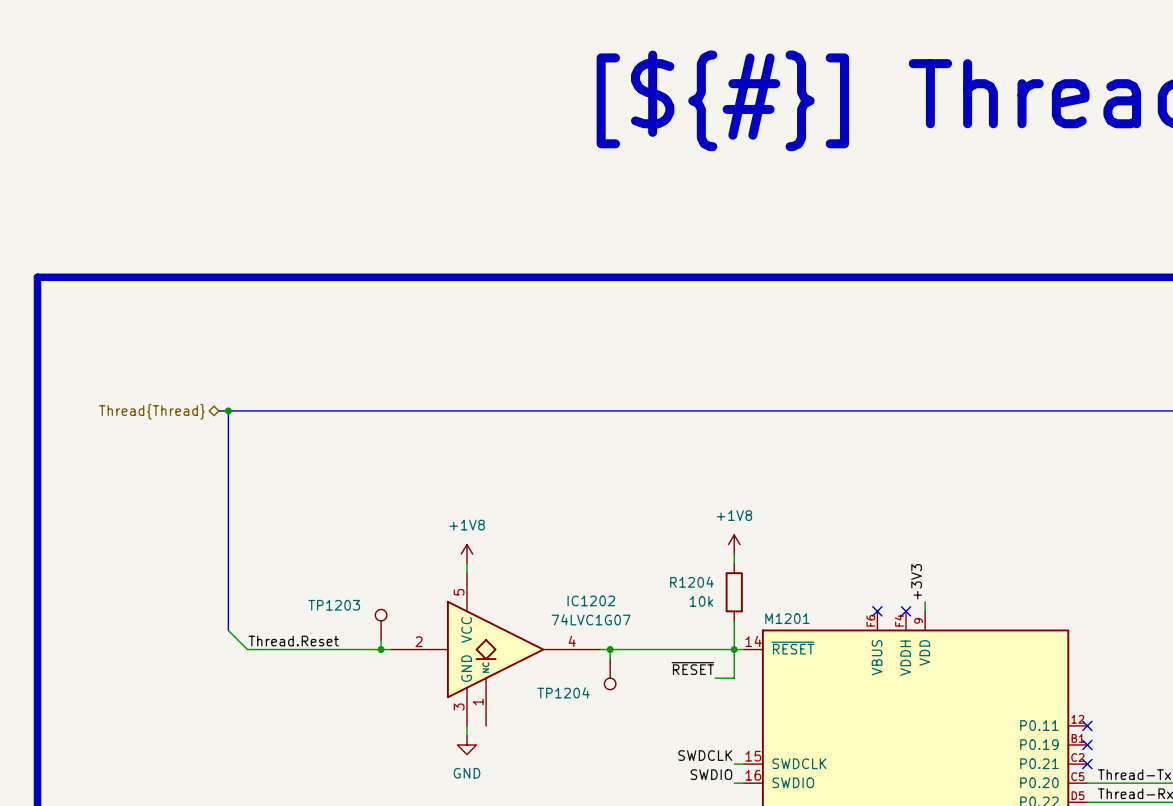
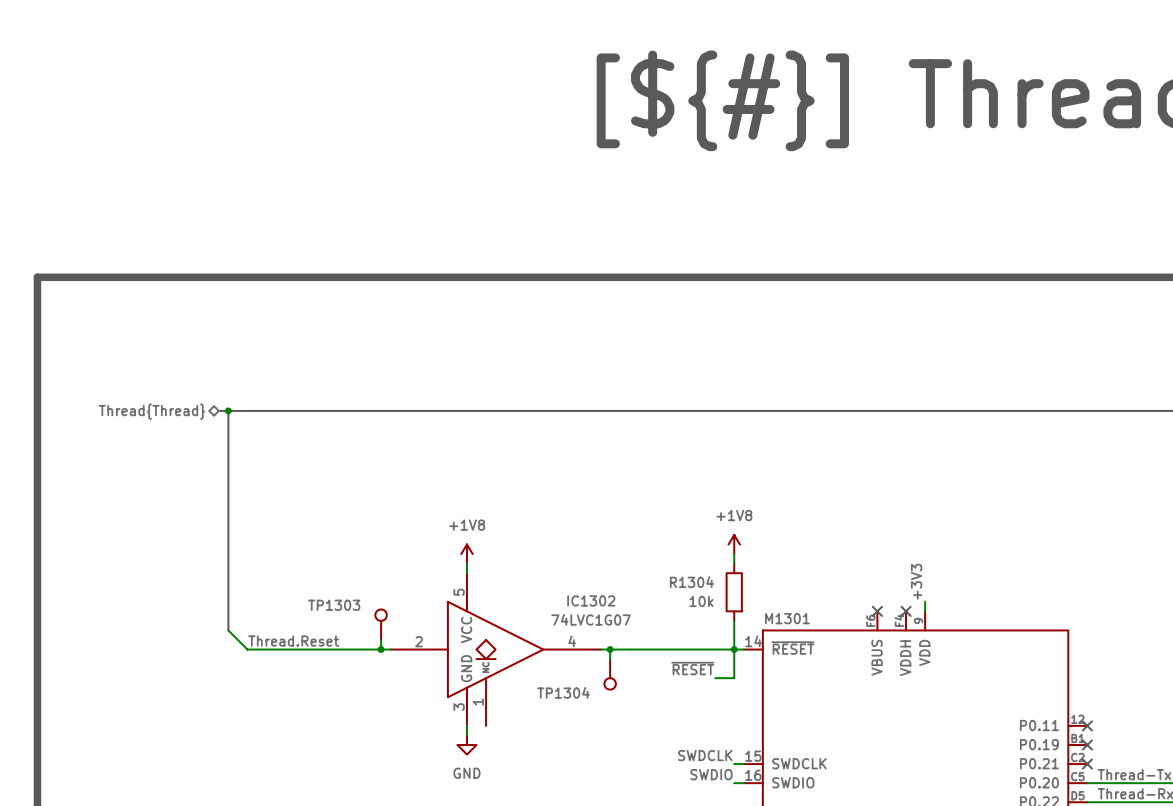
R1204 name: R1204 (691, 582) -> R1304 (691, 582)
IC1202 name: IC1202 (591, 600) -> IC1302 (591, 600)
TP1203 name: TP1203 (334, 605) -> TP1303 (334, 605)
M1201 name: M1201 (787, 618) -> M1301 (787, 618)
TP1204 name: TP1204 (563, 692) -> TP1304 (563, 692)

